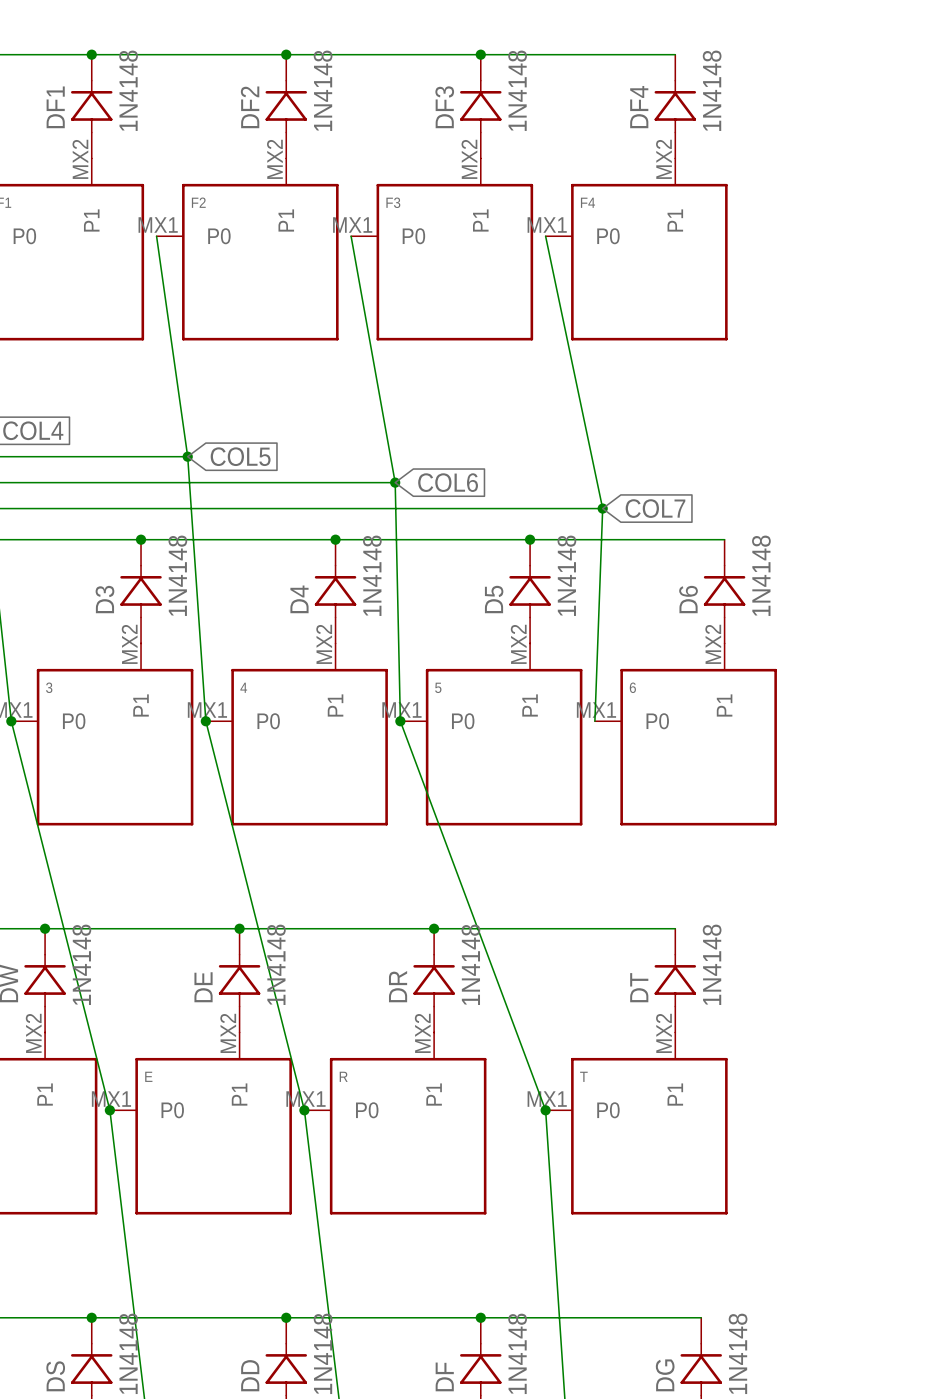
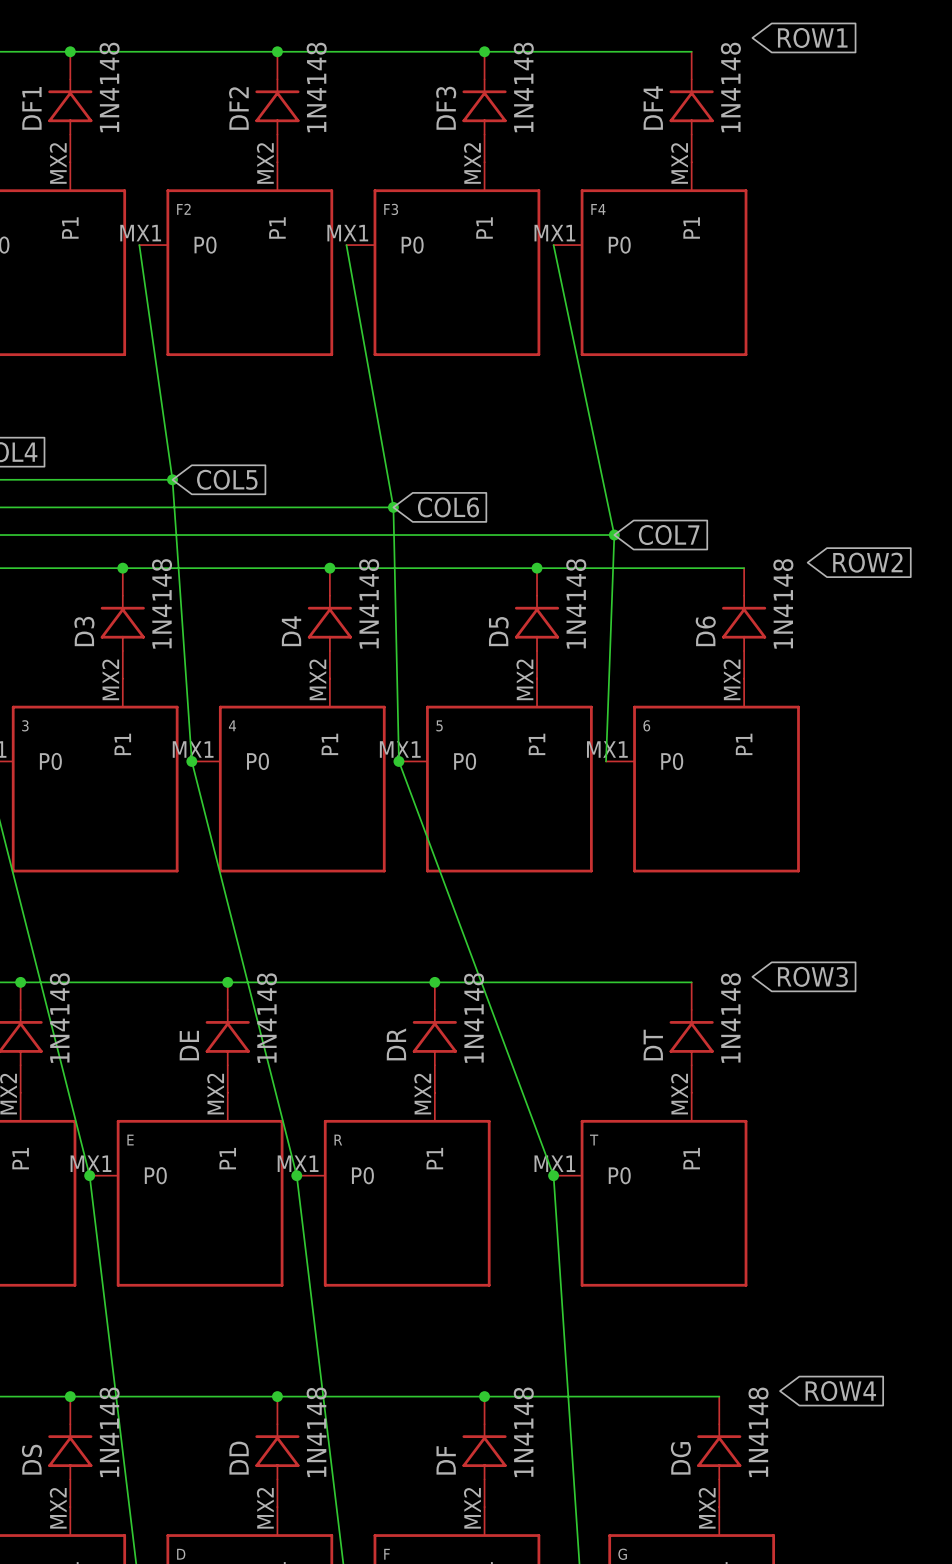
global label: none -> ROW1 (812, 37)
global label: none -> ROW2 (867, 562)
global label: none -> ROW3 (812, 976)
global label: none -> ROW4 (840, 1391)

